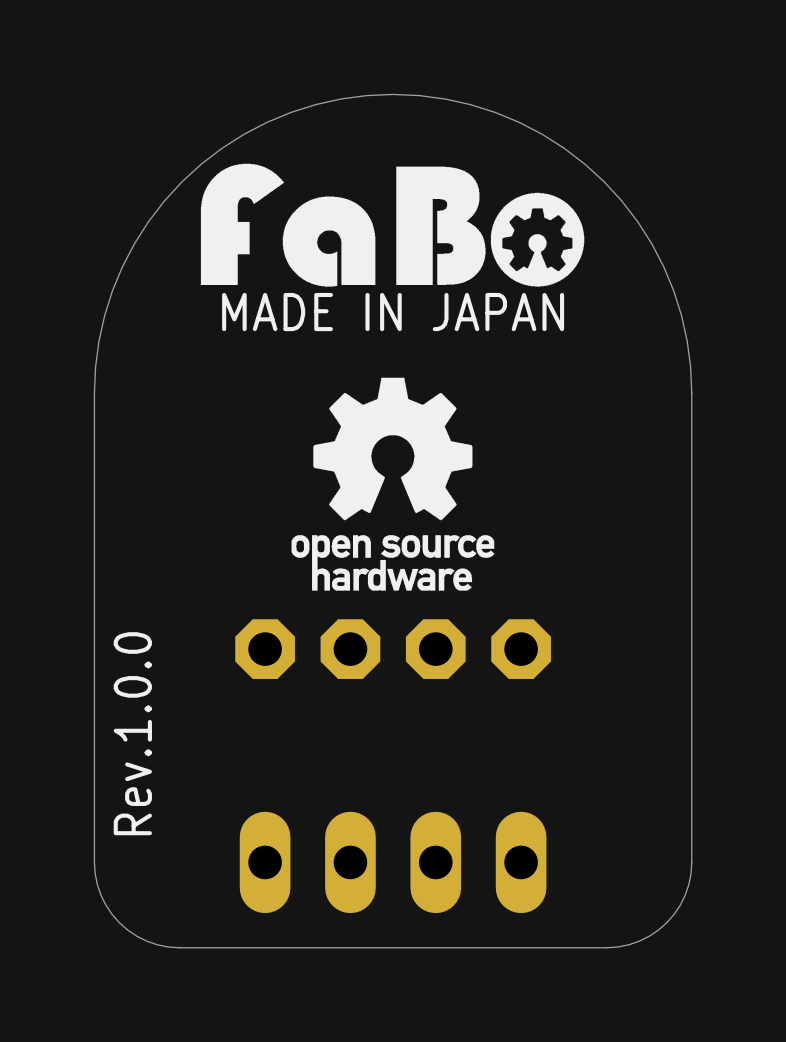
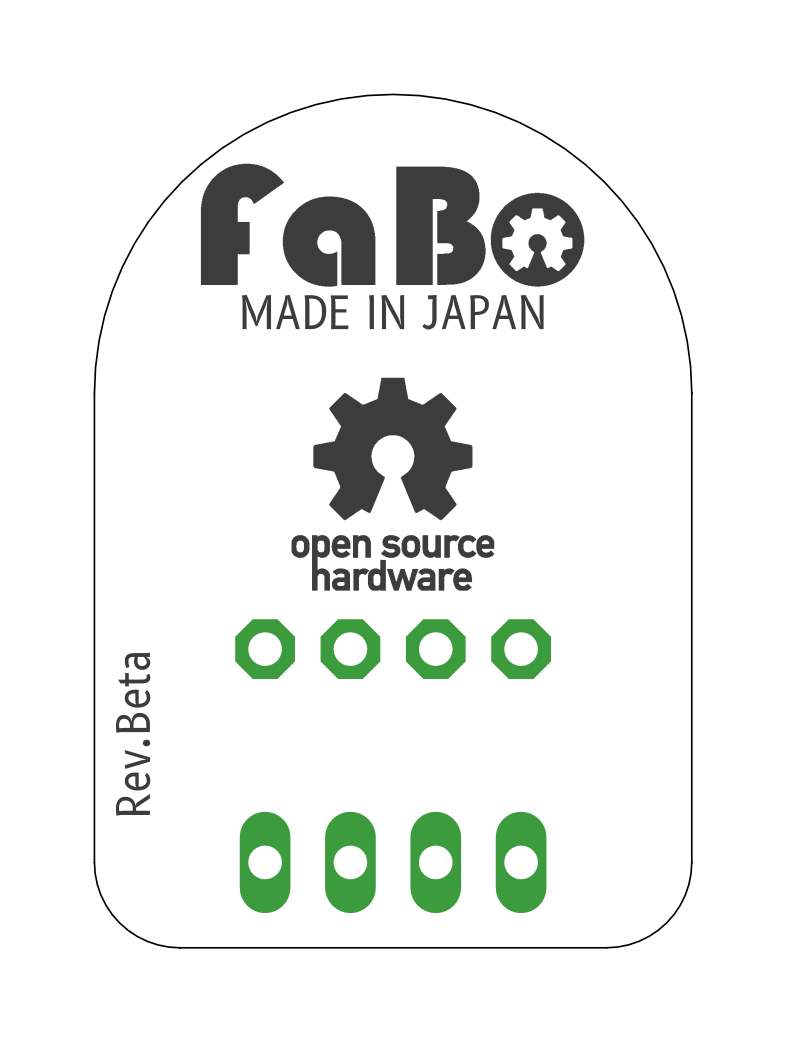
text: Rev.1.0.0 (132, 733) -> Rev.Beta (133, 734)

